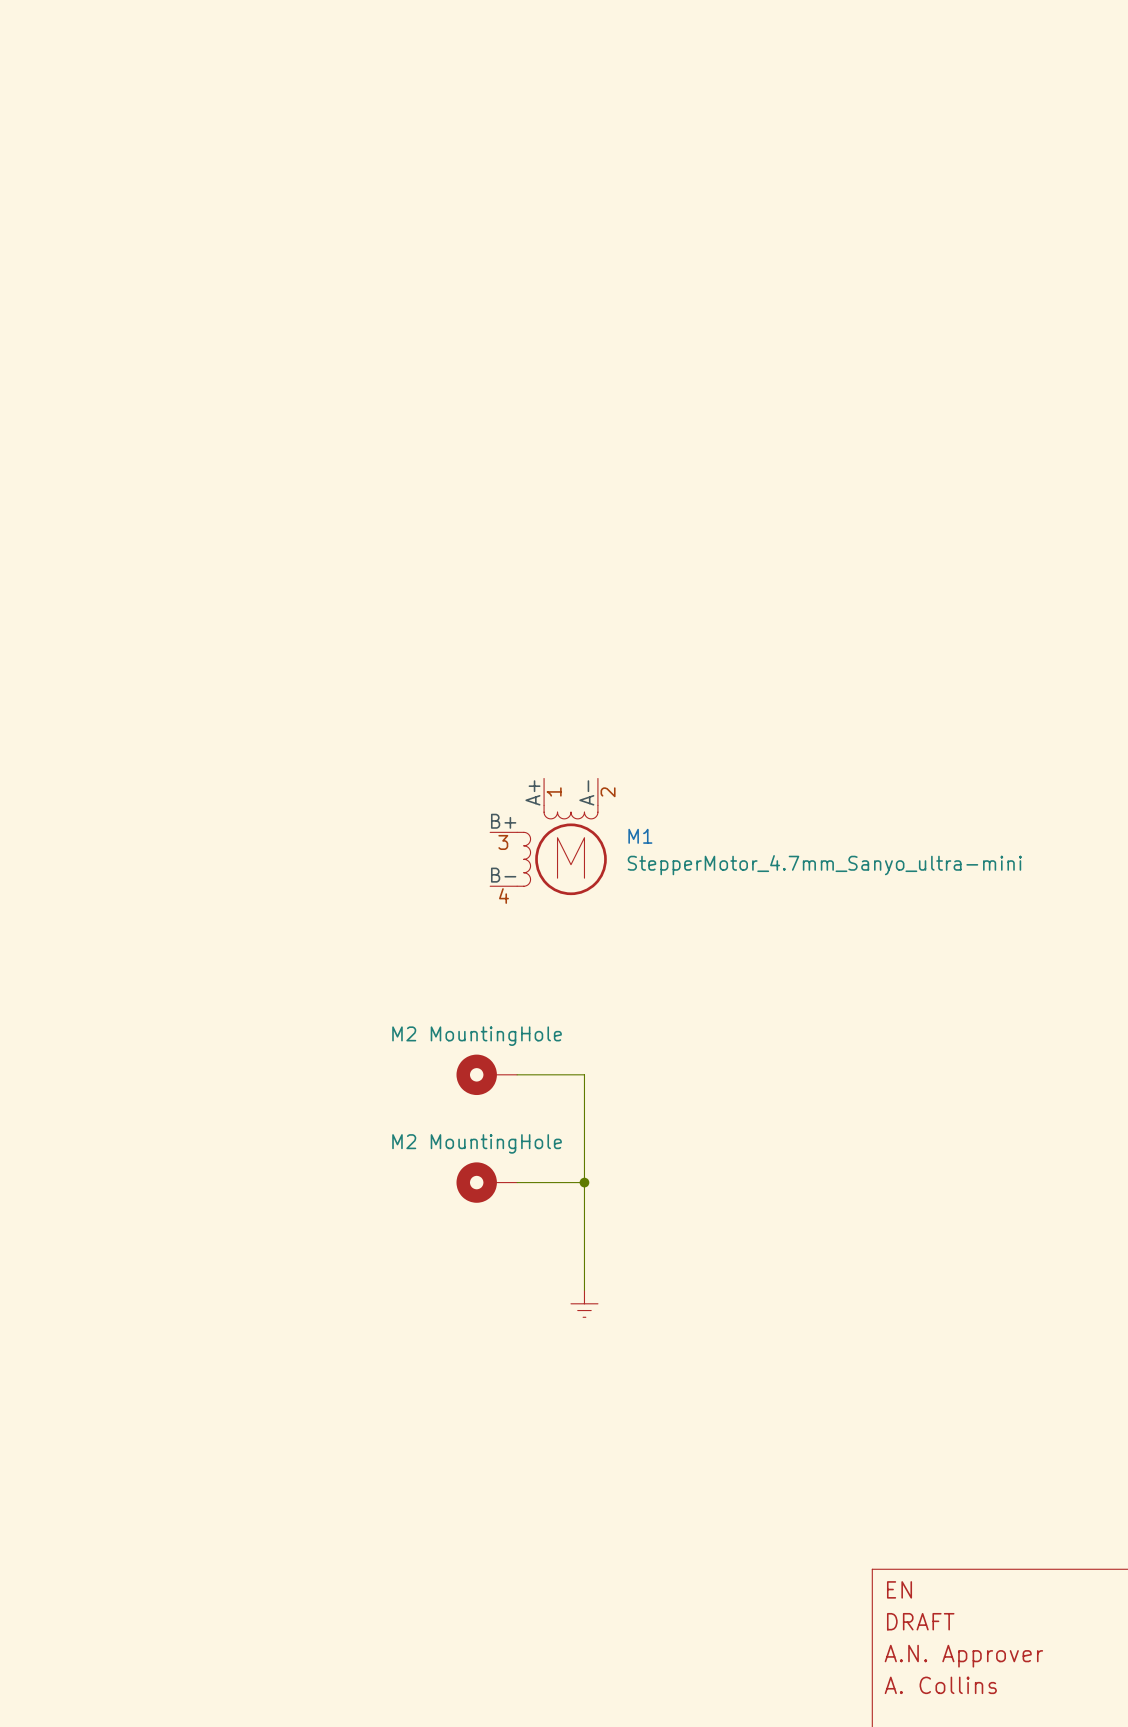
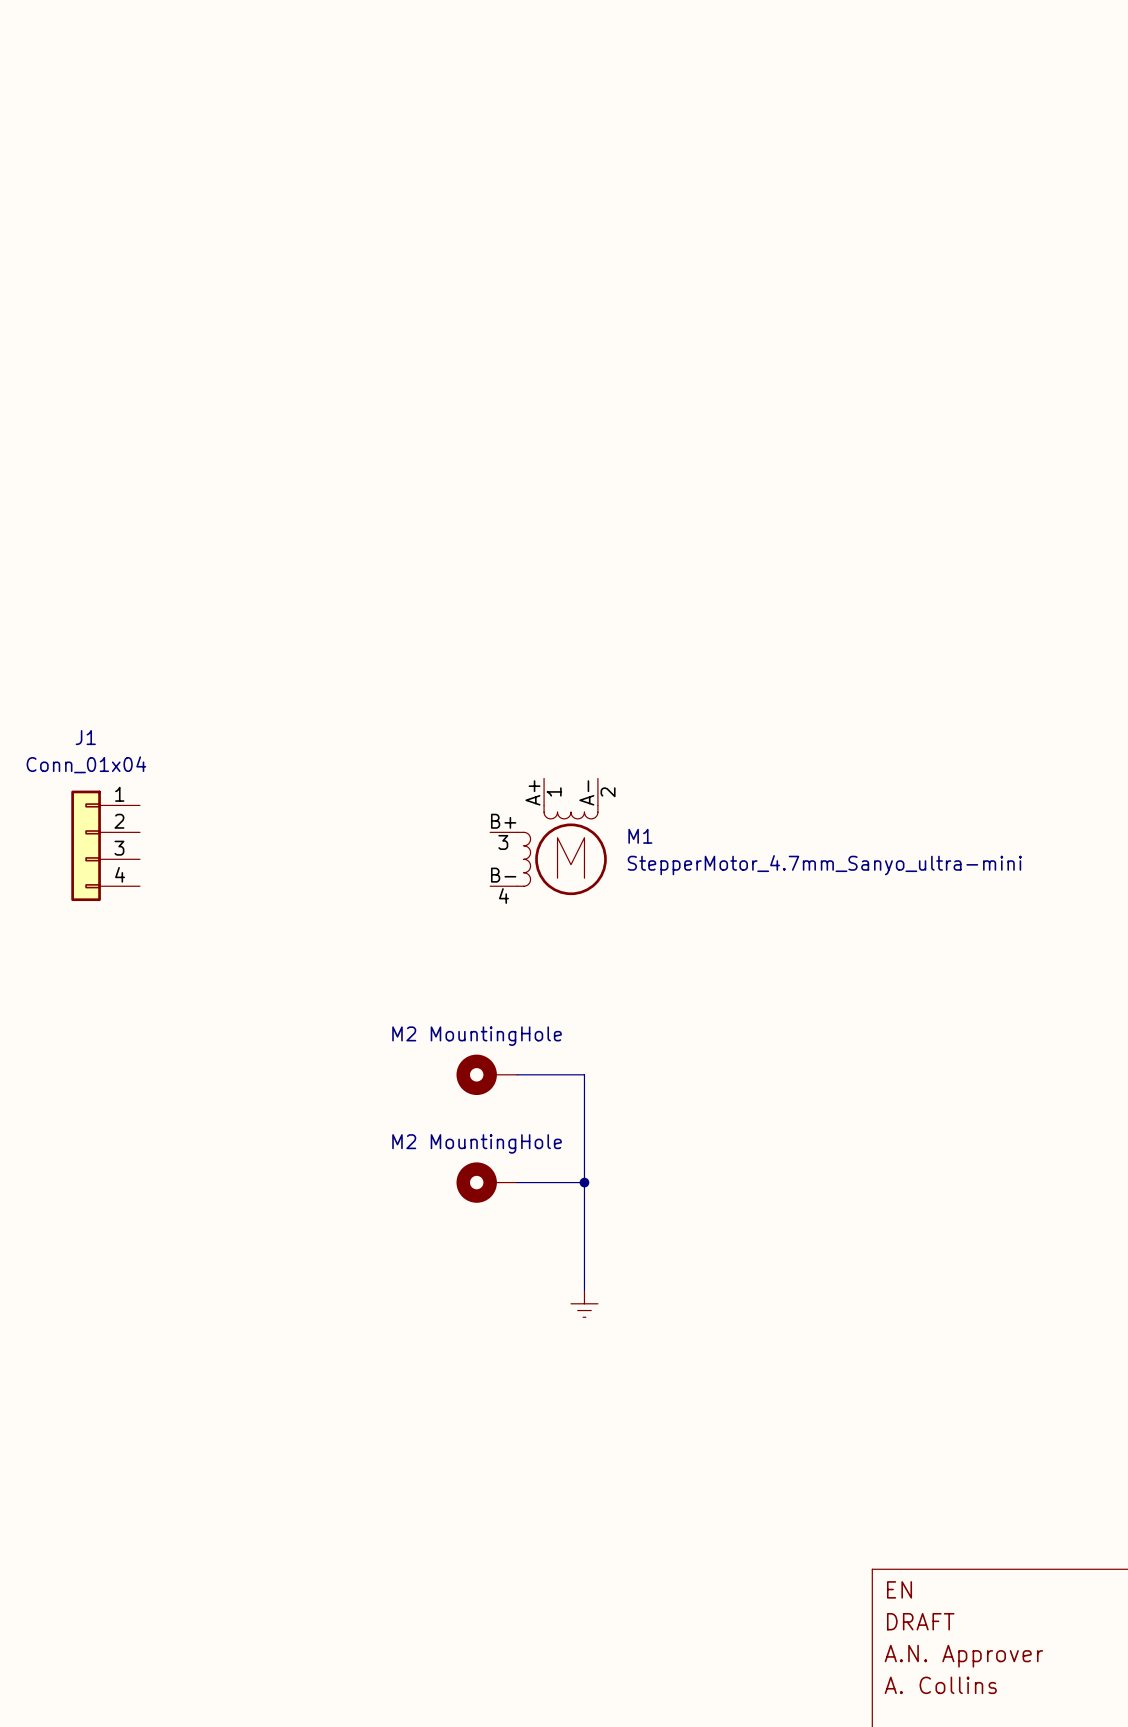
J1: none -> Conn_01x04 (105, 845)

